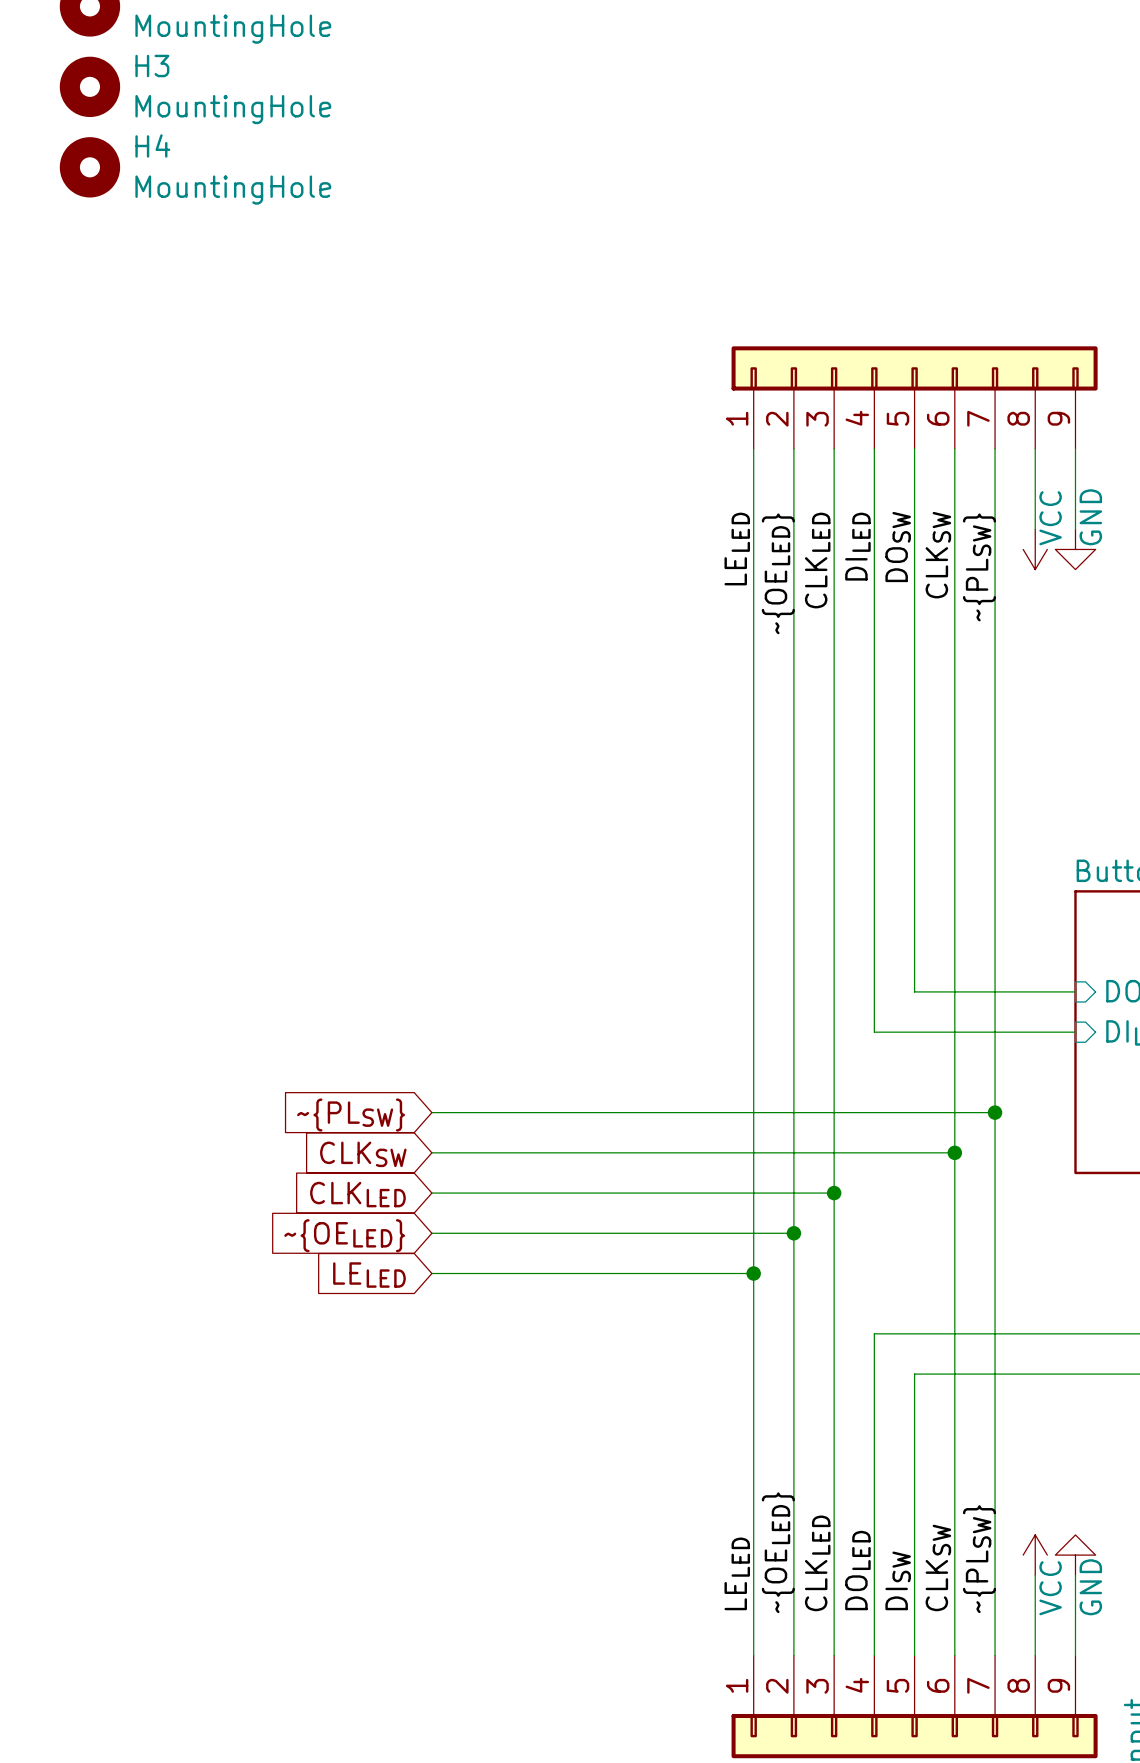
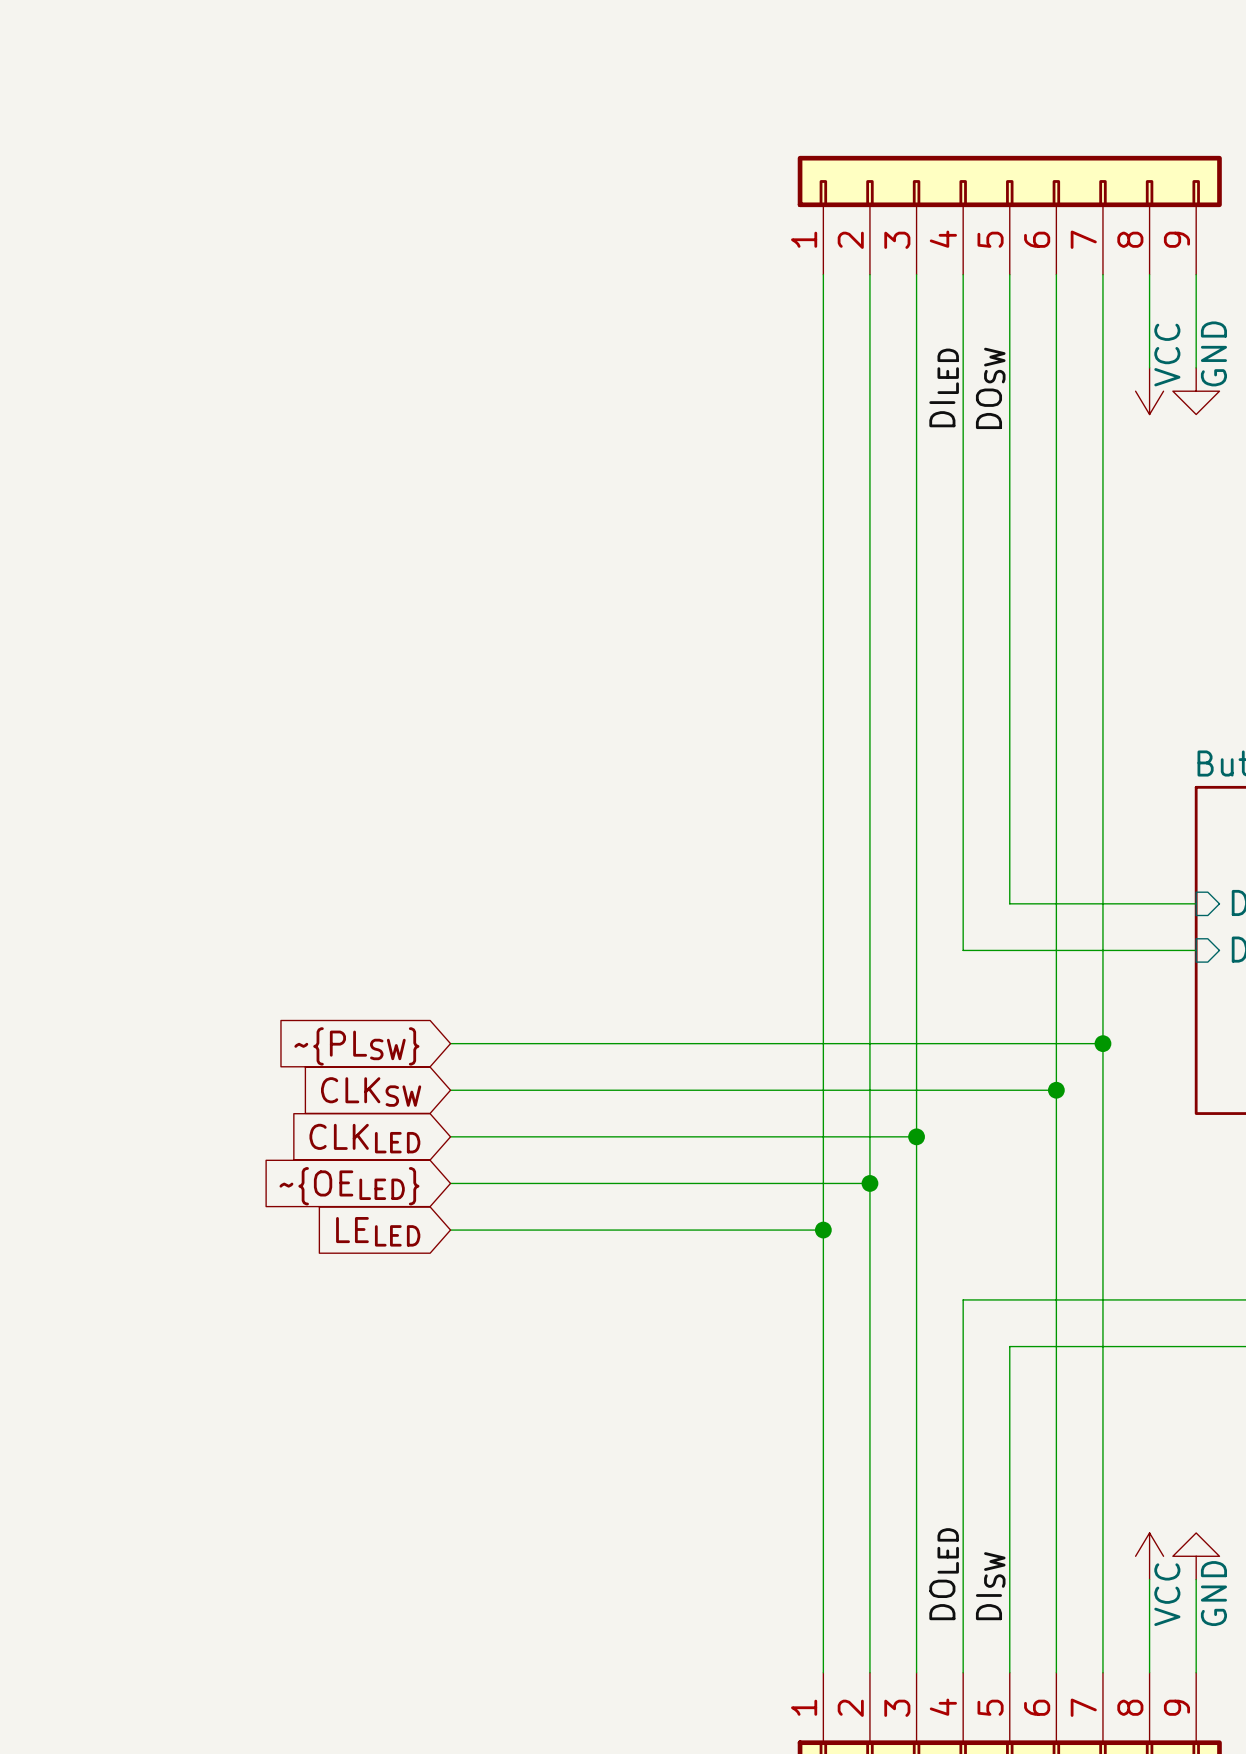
label: LELED (737, 549) -> none
label: CLKSW (938, 555) -> none
label: CLKLED (817, 560) -> none
label: ~{PLSW} (979, 567) -> none
label: ~{OELED} (778, 573) -> none
label: ~{OELED} (778, 1552) -> none
label: ~{PLSW} (979, 1559) -> none
label: CLKLED (817, 1563) -> none
label: CLKSW (938, 1567) -> none
label: LELED (737, 1573) -> none

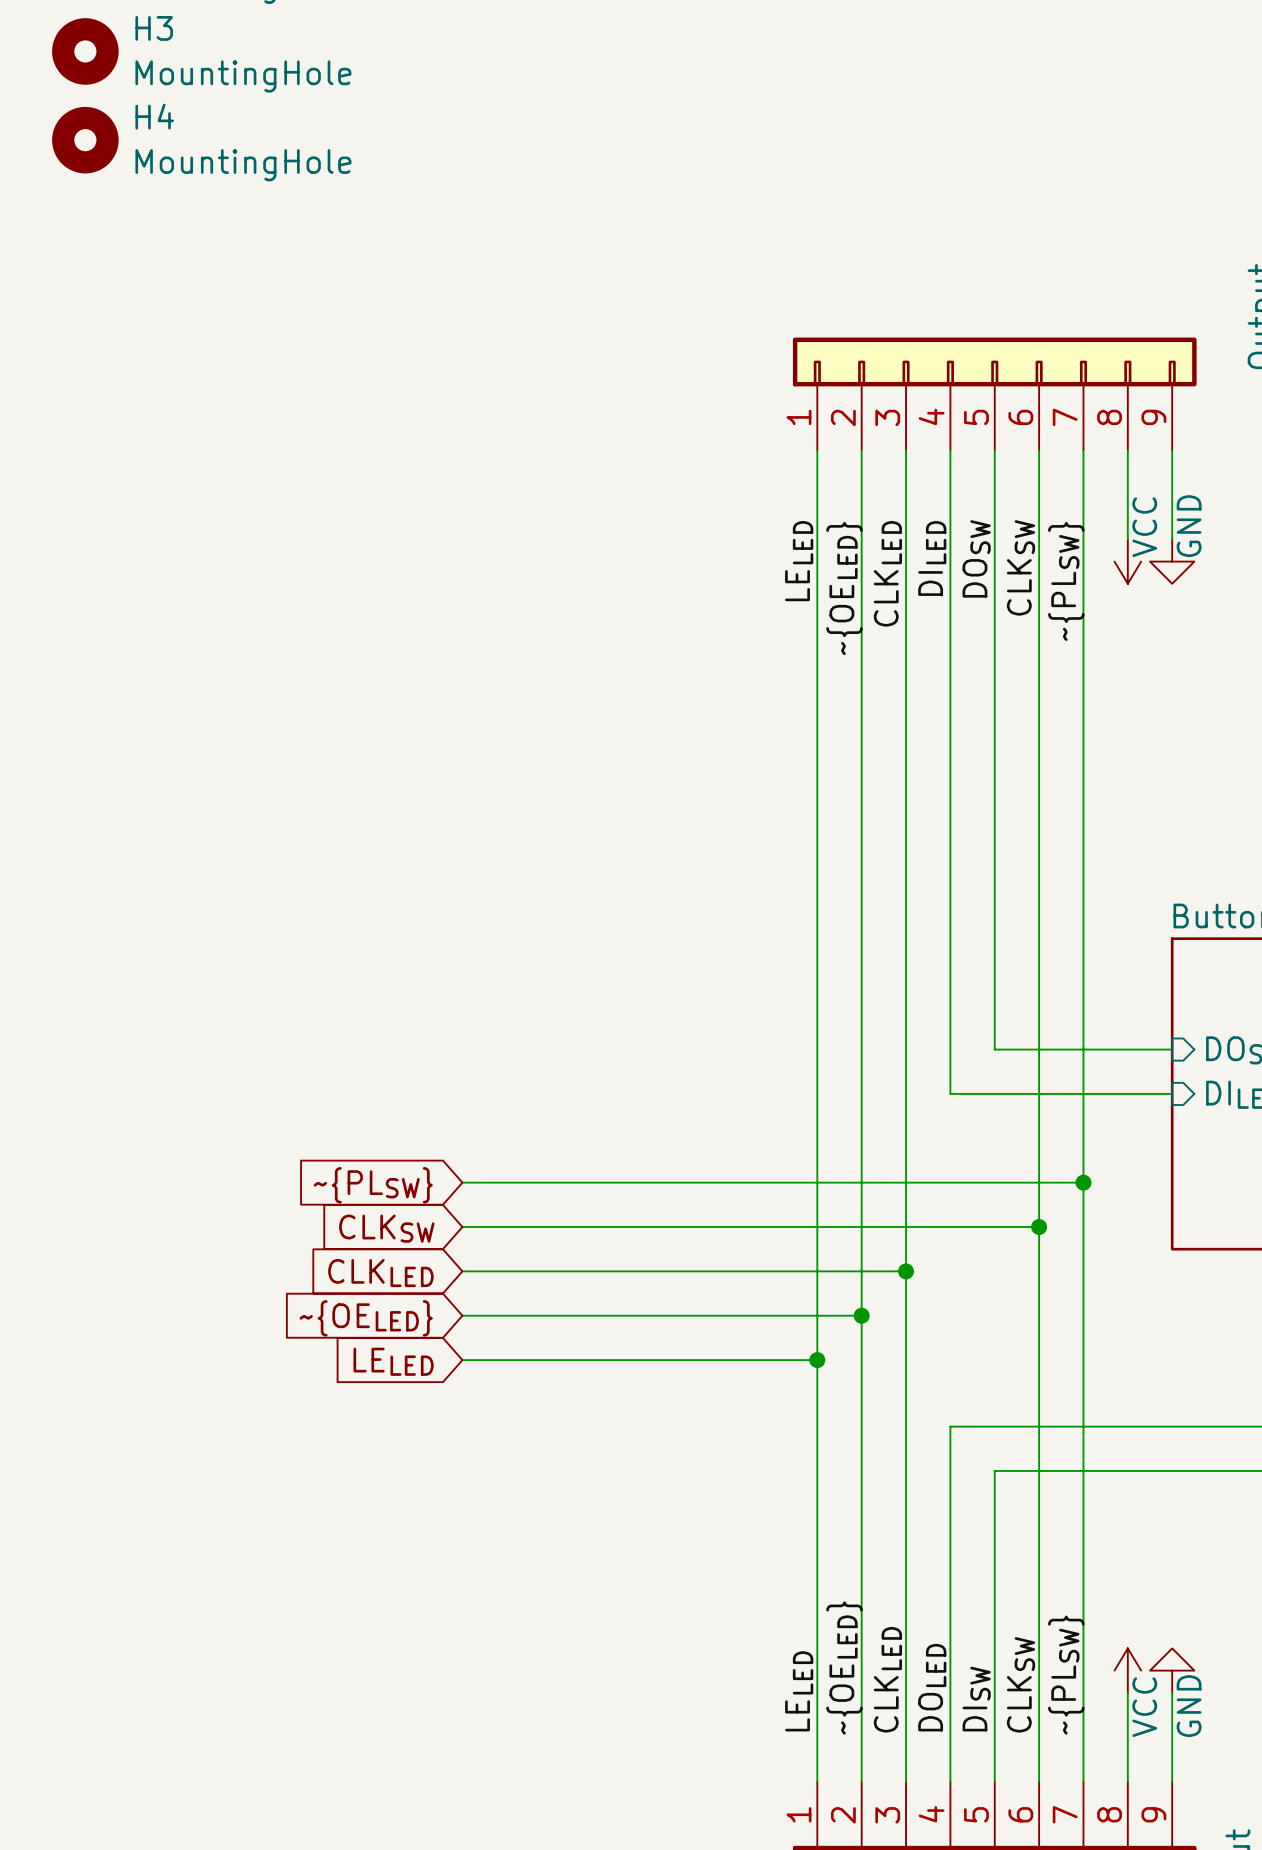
label: none -> LELED (799, 561)
label: none -> CLKSW (1020, 567)
label: none -> CLKLED (887, 573)
label: none -> ~{PLSW} (1066, 581)
label: none -> ~{OELED} (844, 588)
label: none -> ~{OELED} (844, 1668)
label: none -> ~{PLSW} (1066, 1675)
label: none -> CLKLED (887, 1679)
label: none -> CLKSW (1020, 1684)
label: none -> LELED (799, 1691)

